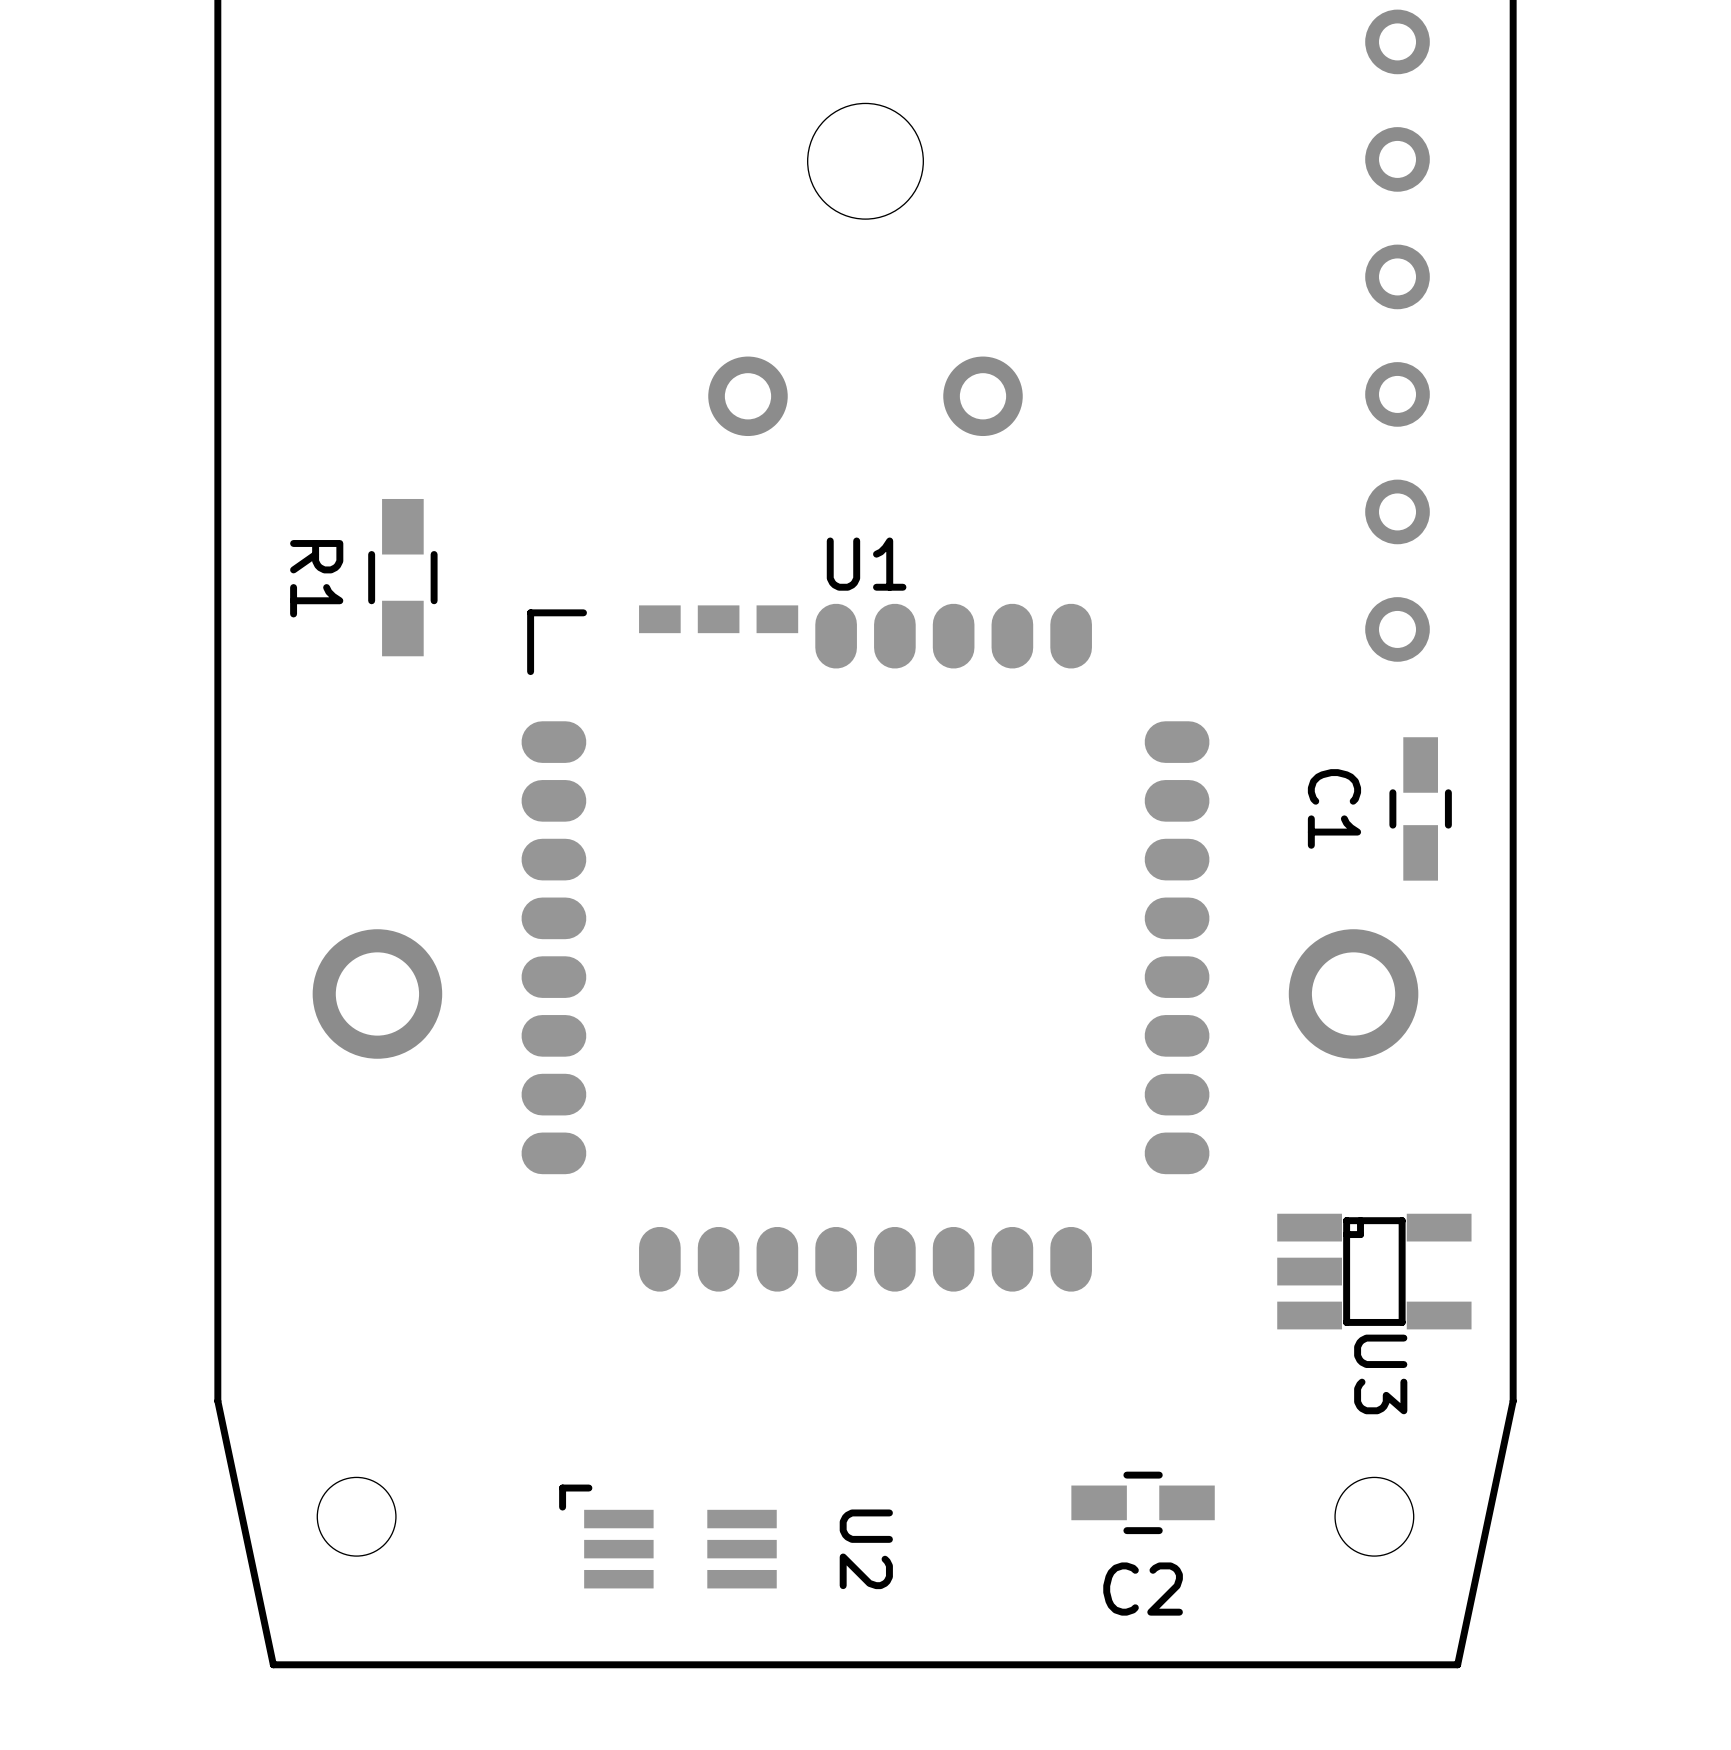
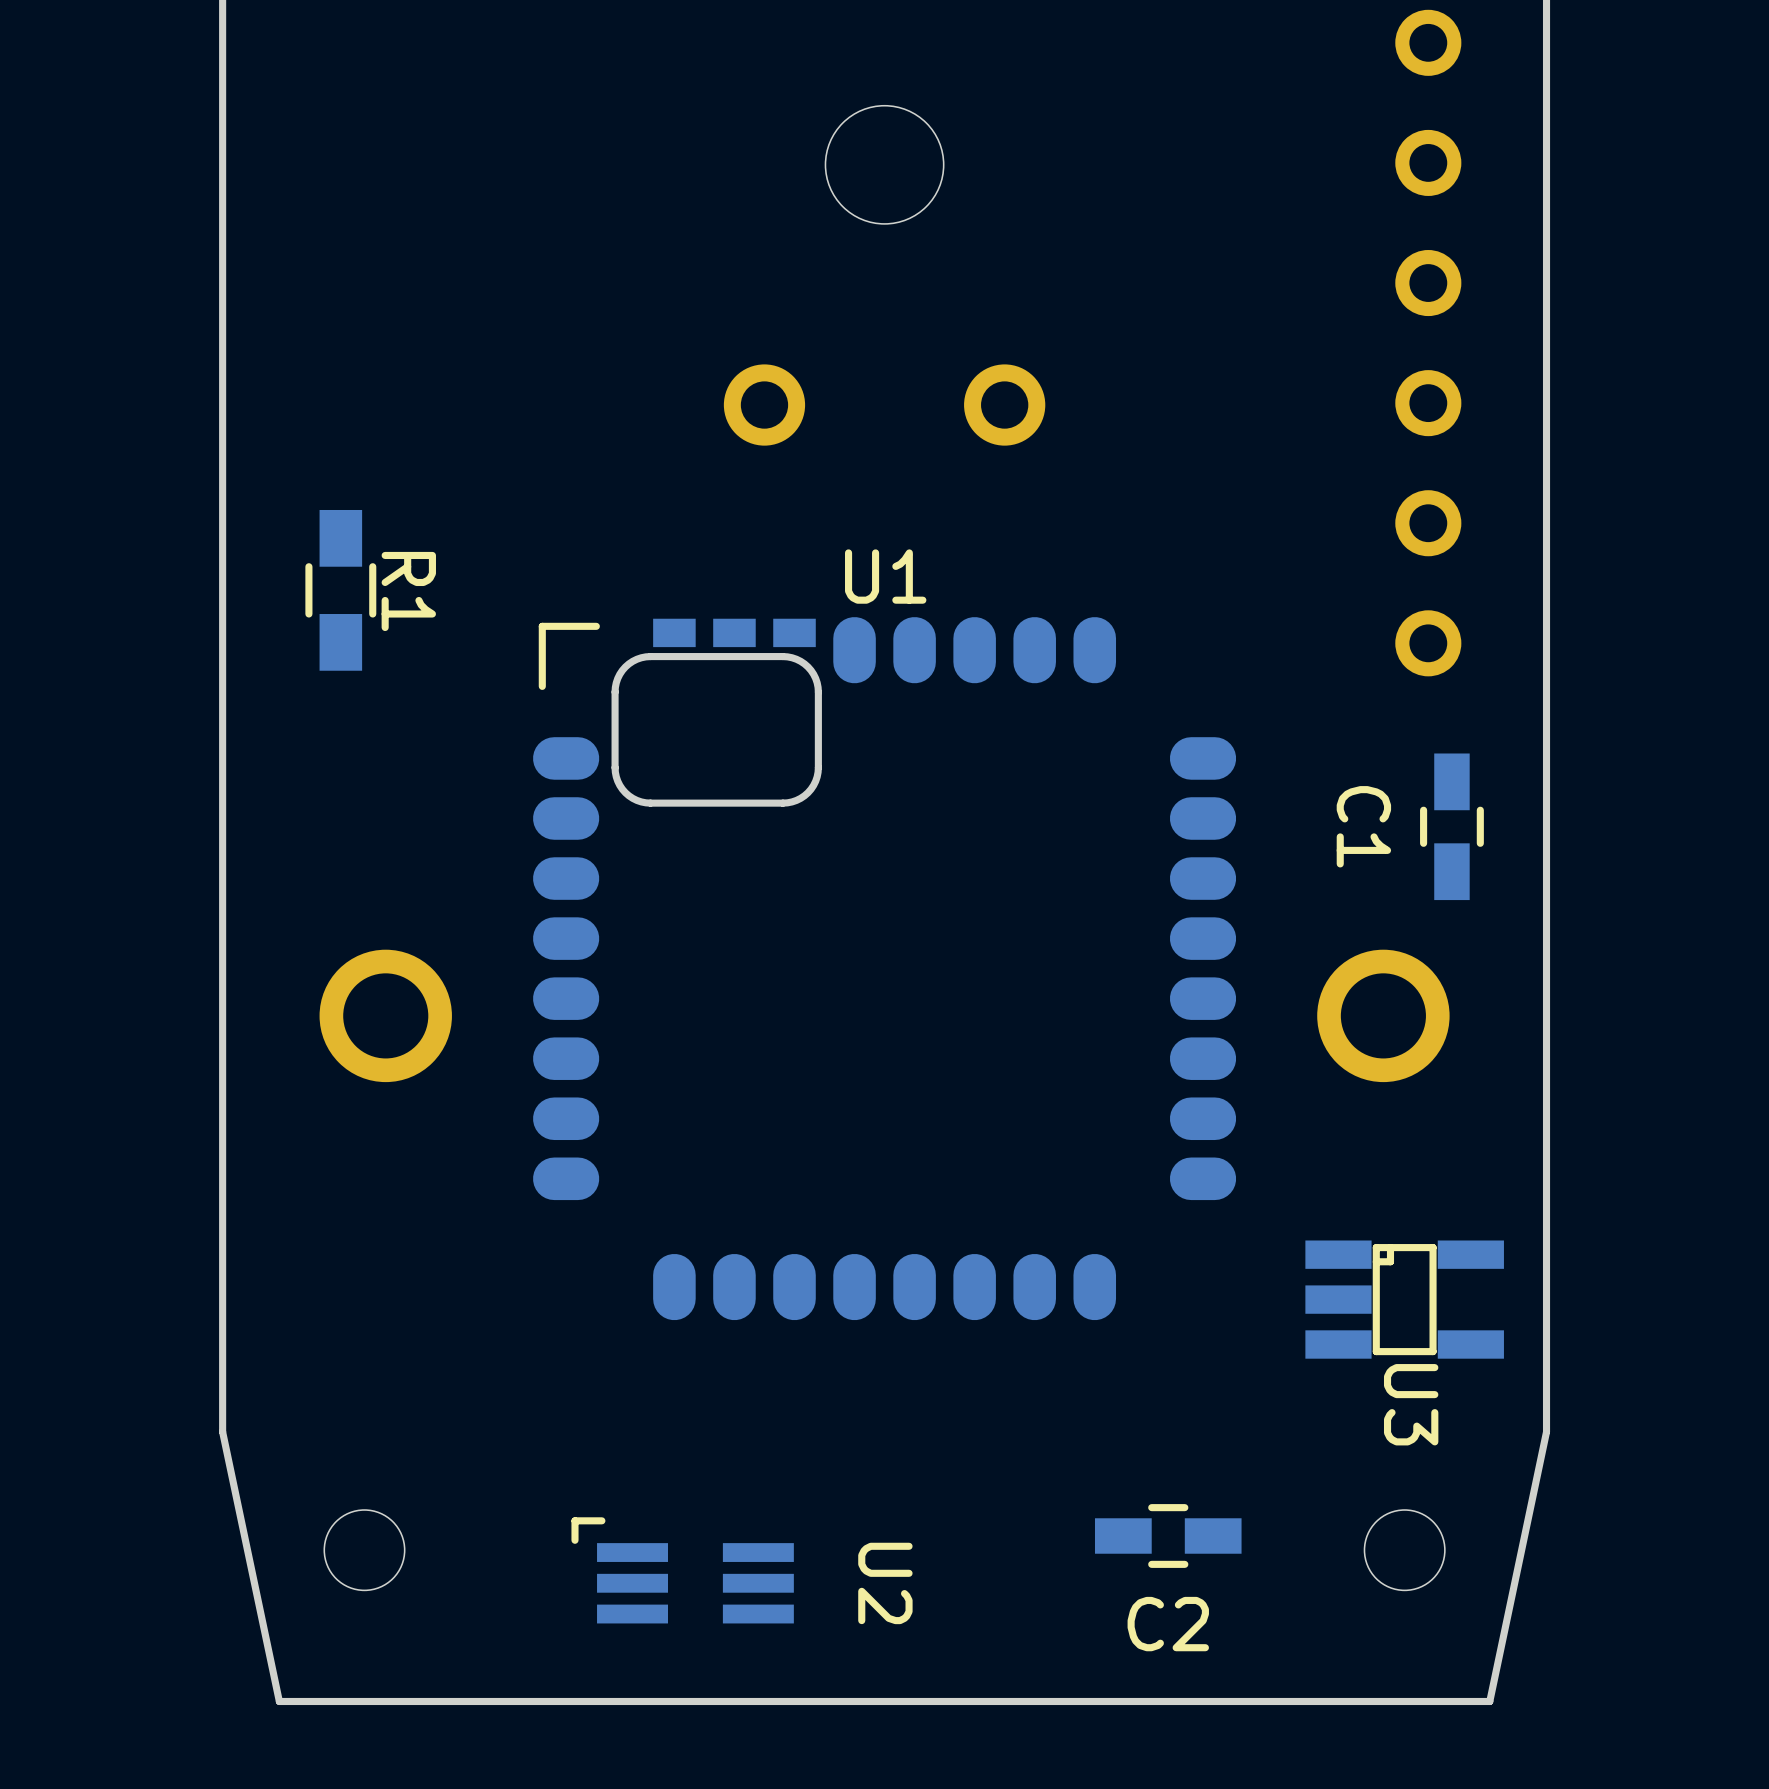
R1 position: (402, 577) -> (340, 590)
R1 name position: R1 (316, 578) -> R1 (408, 591)
U1 footprint: [521, 603, 1210, 1292] -> [533, 617, 1237, 1321]

